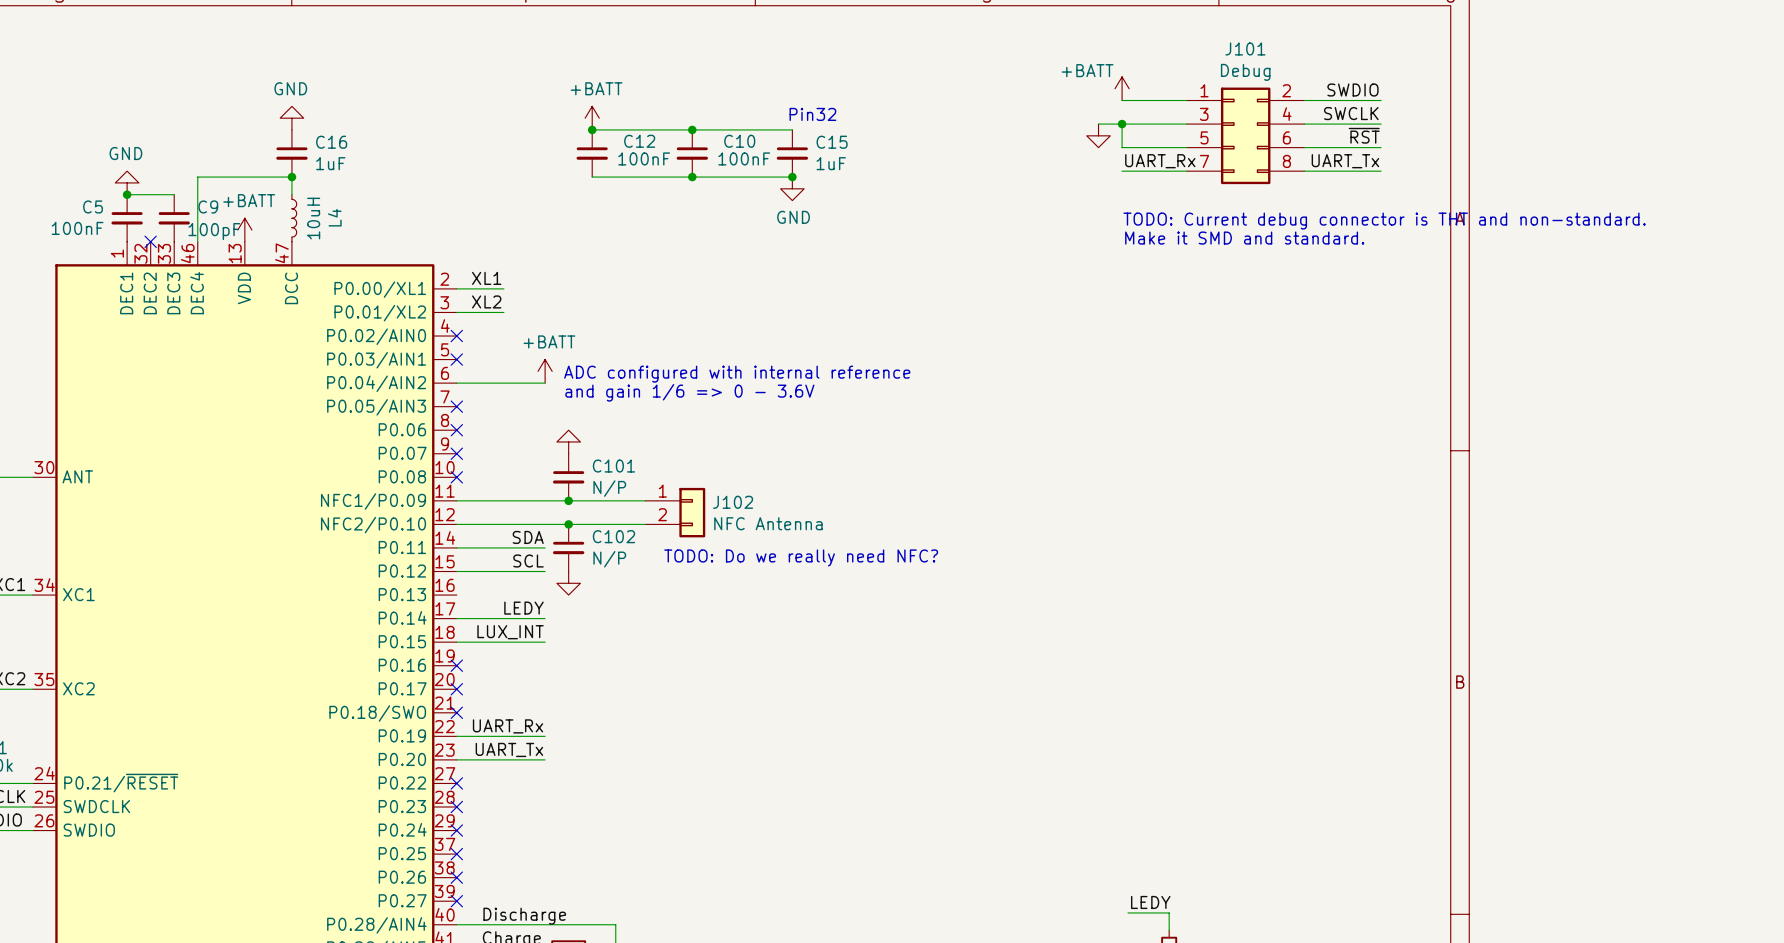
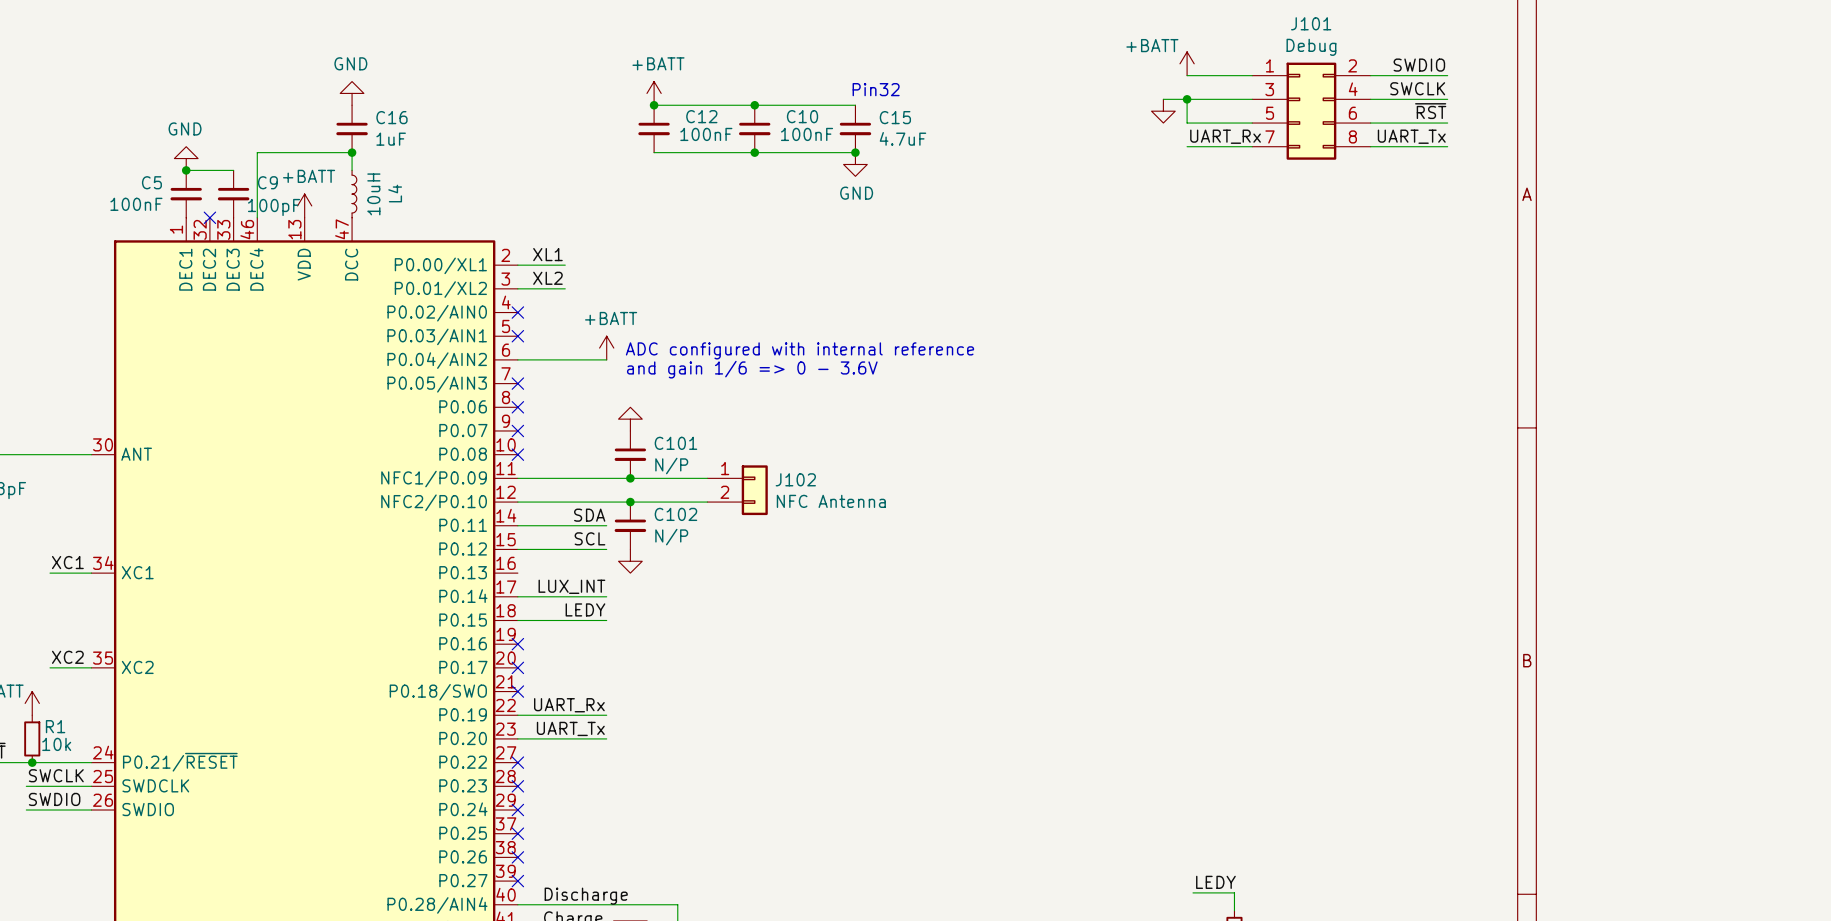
C15 value: 1uF (831, 163) -> 4.7uF (902, 138)
text: TODO: Current debug connector is THT and non-standard. (1384, 221) -> none
text: Make it SMD and standard. (1244, 238) -> none
text: TODO: Do we really need NFC? (801, 557) -> none
label: LEDY (523, 608) -> LUX_INT (571, 586)
label: LUX_INT (510, 632) -> LEDY (585, 609)

